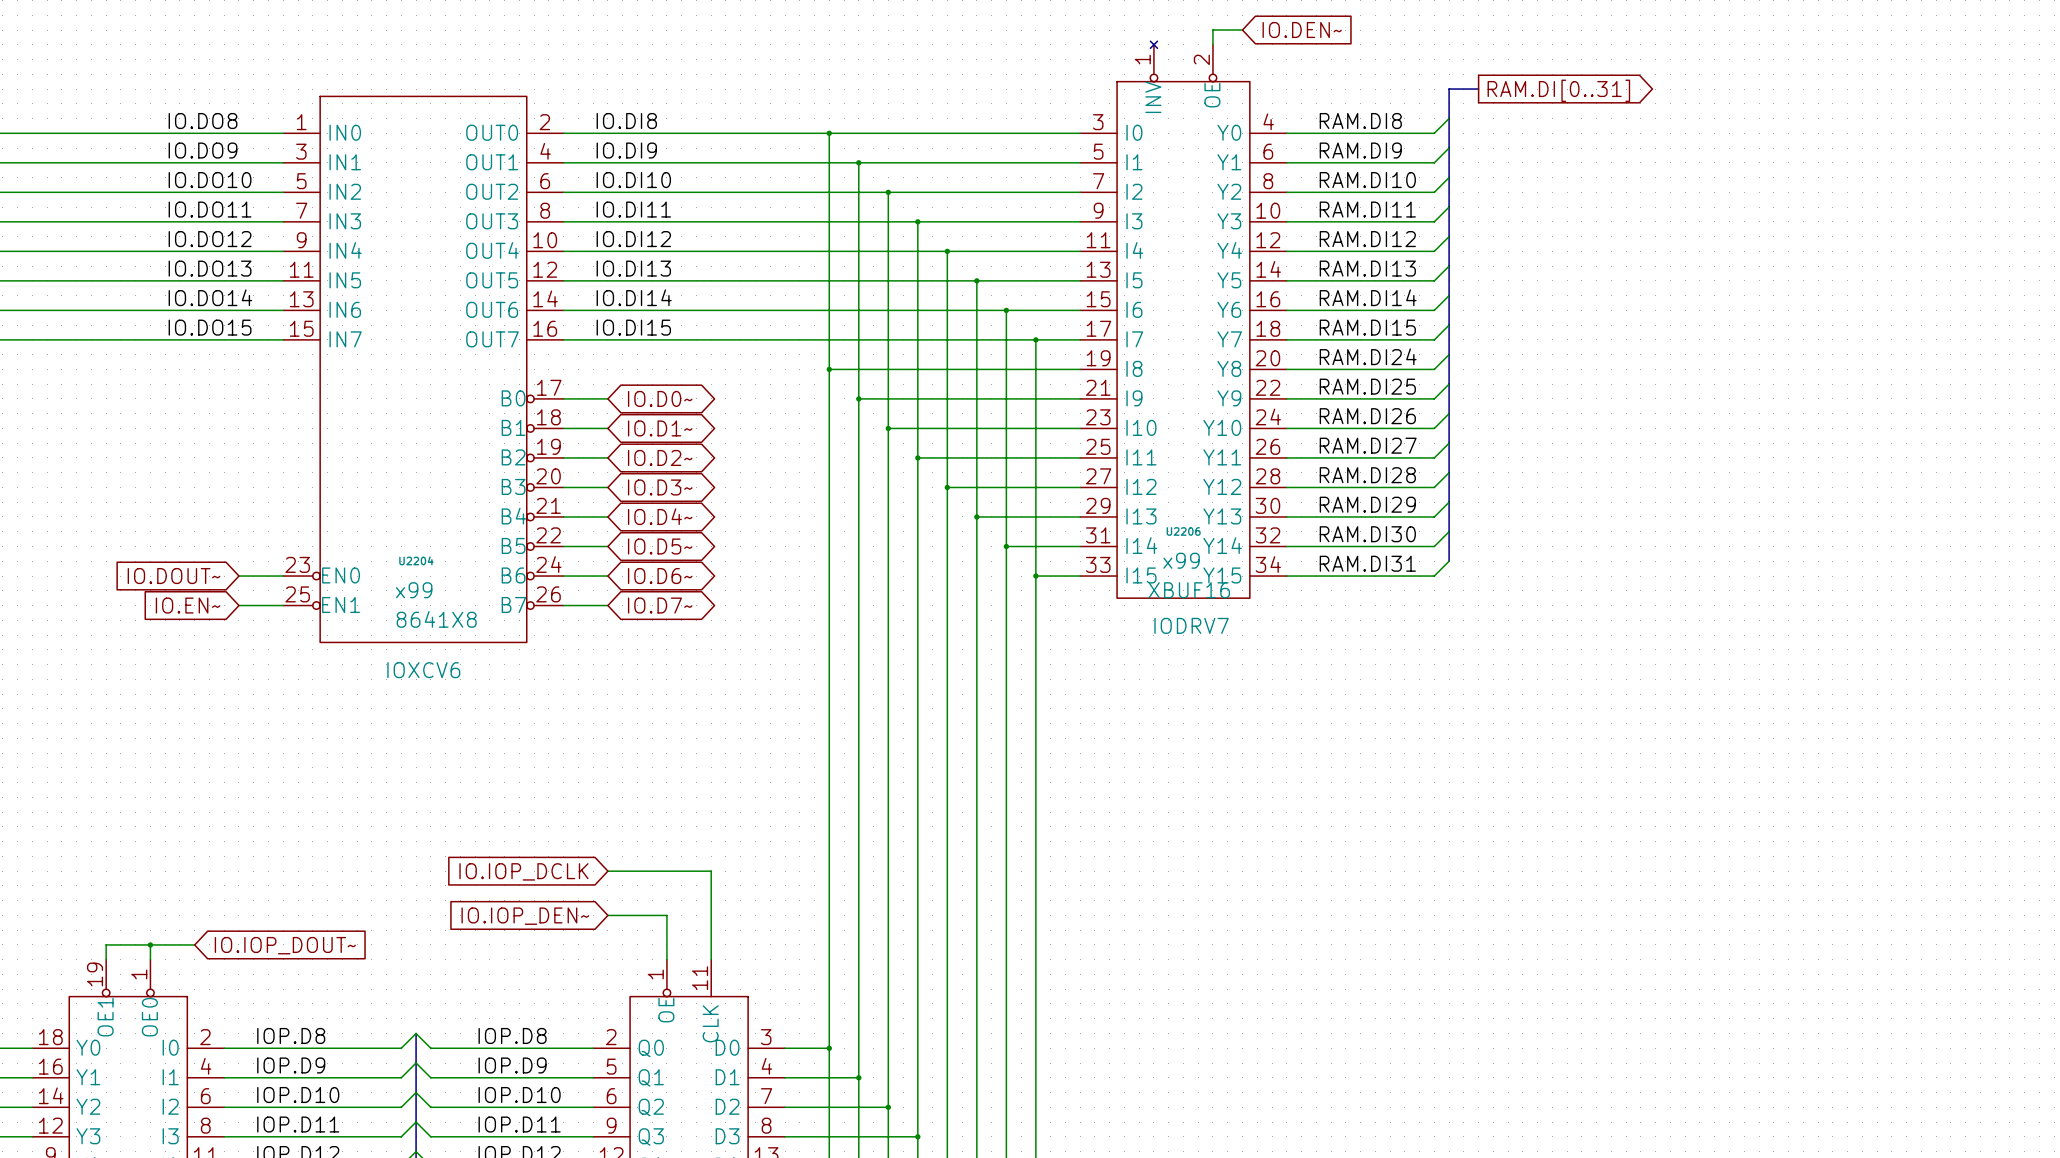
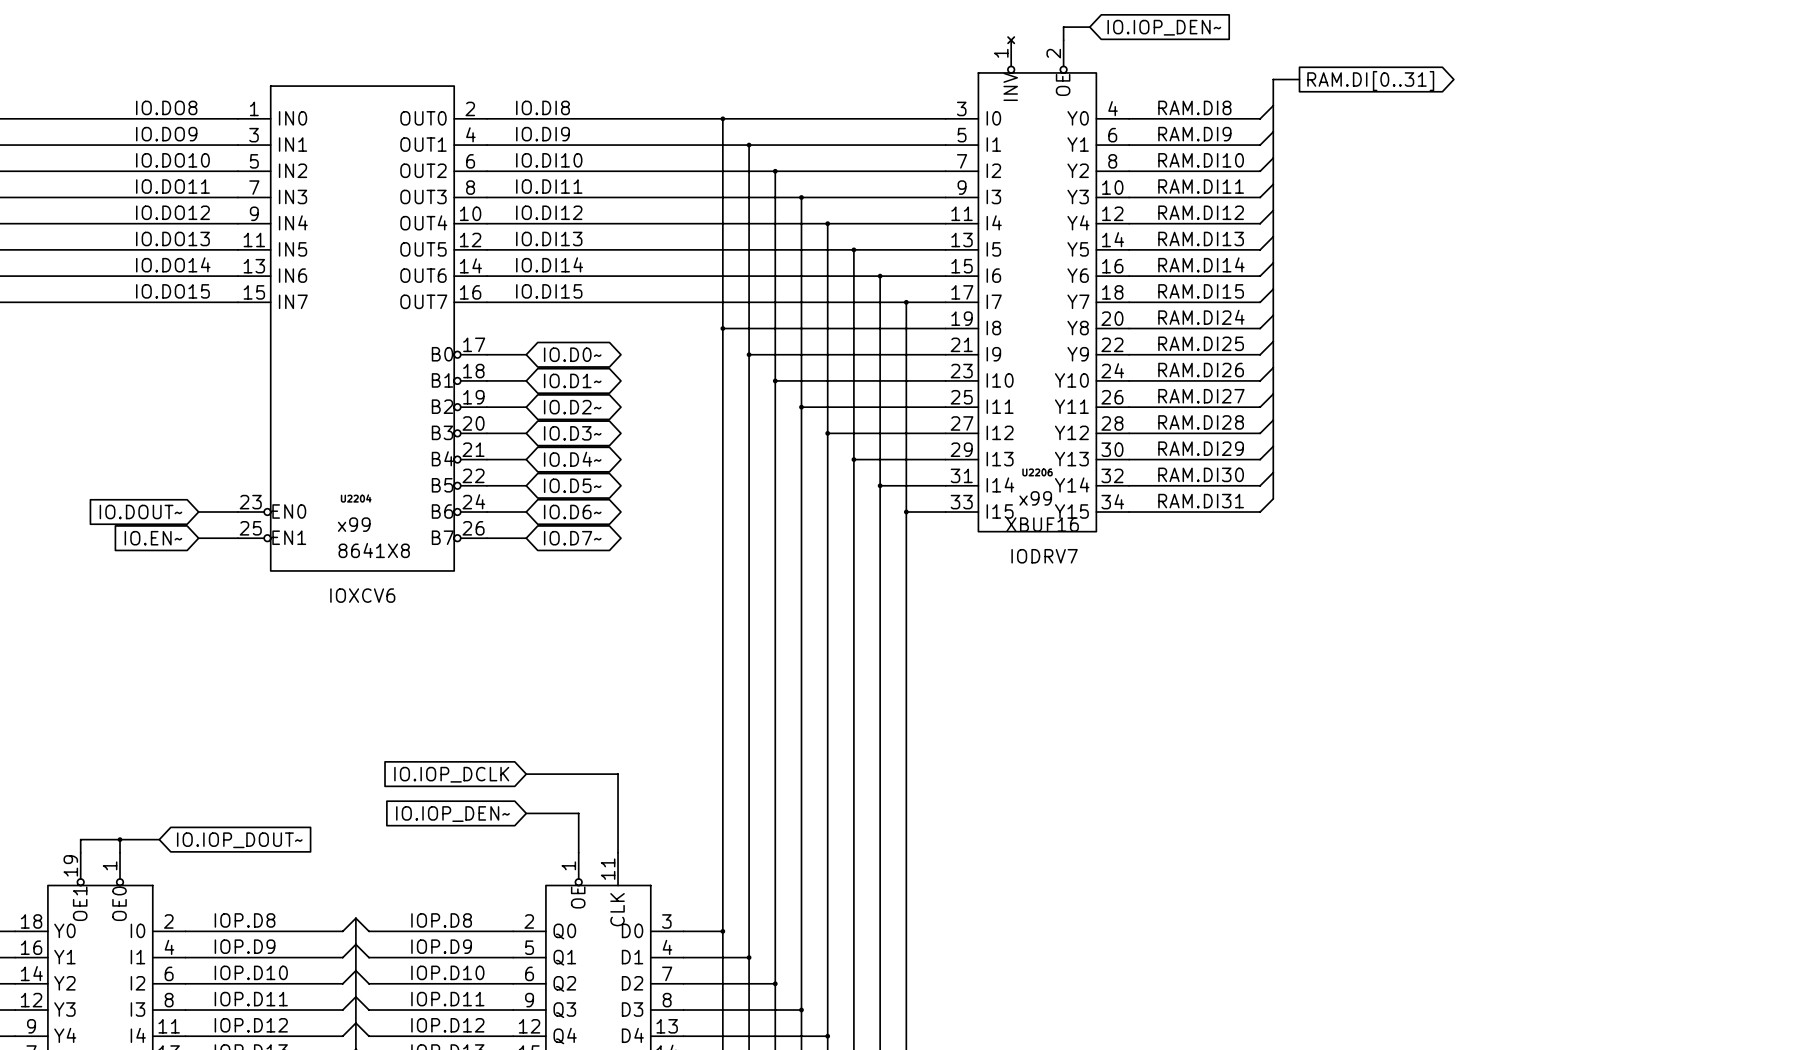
global label: IO.DEN~ (1302, 30) -> IO.IOP_DEN~ (1164, 27)

